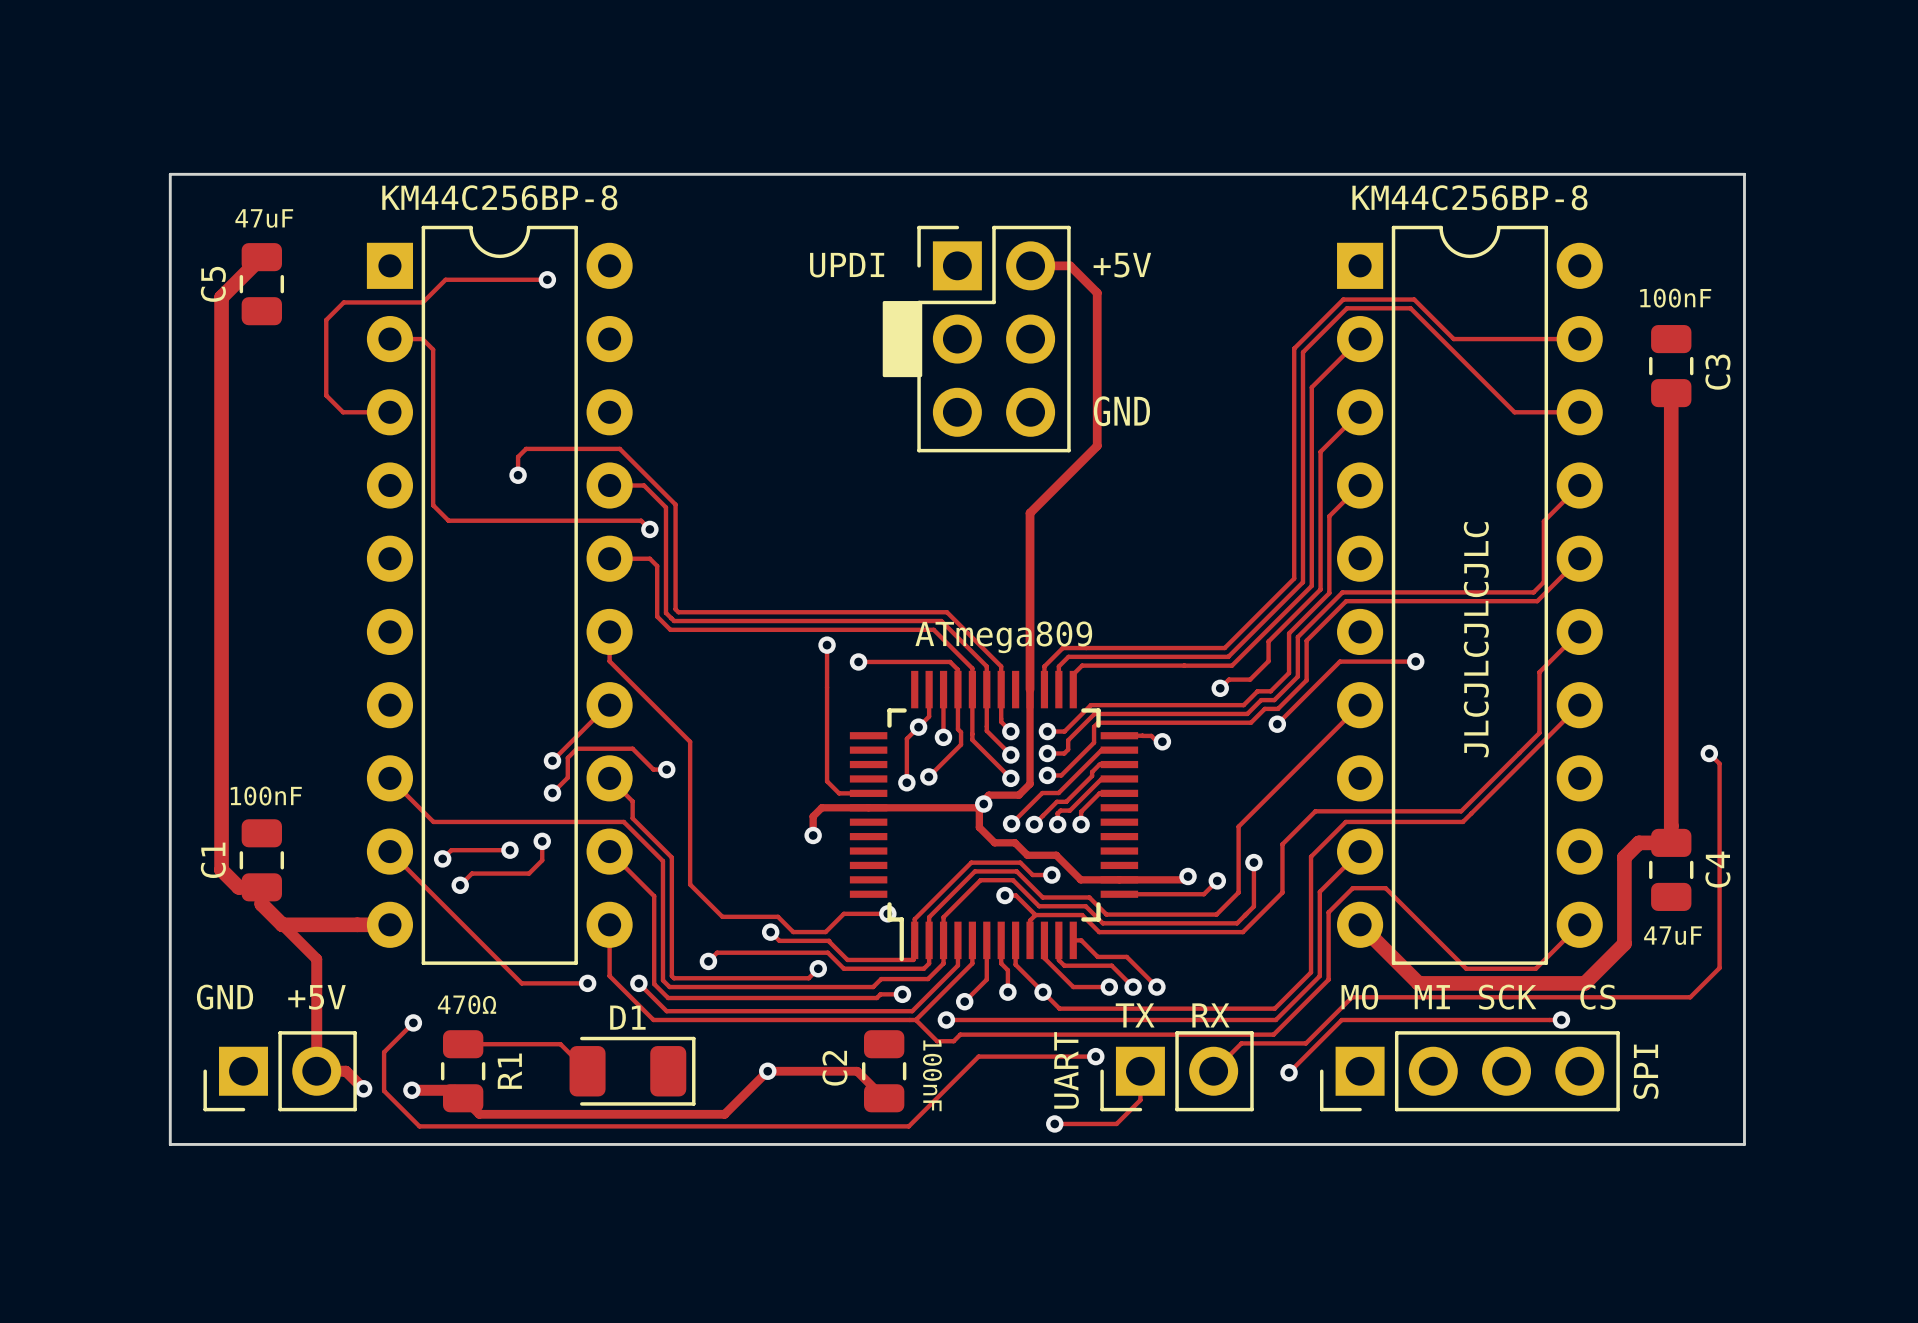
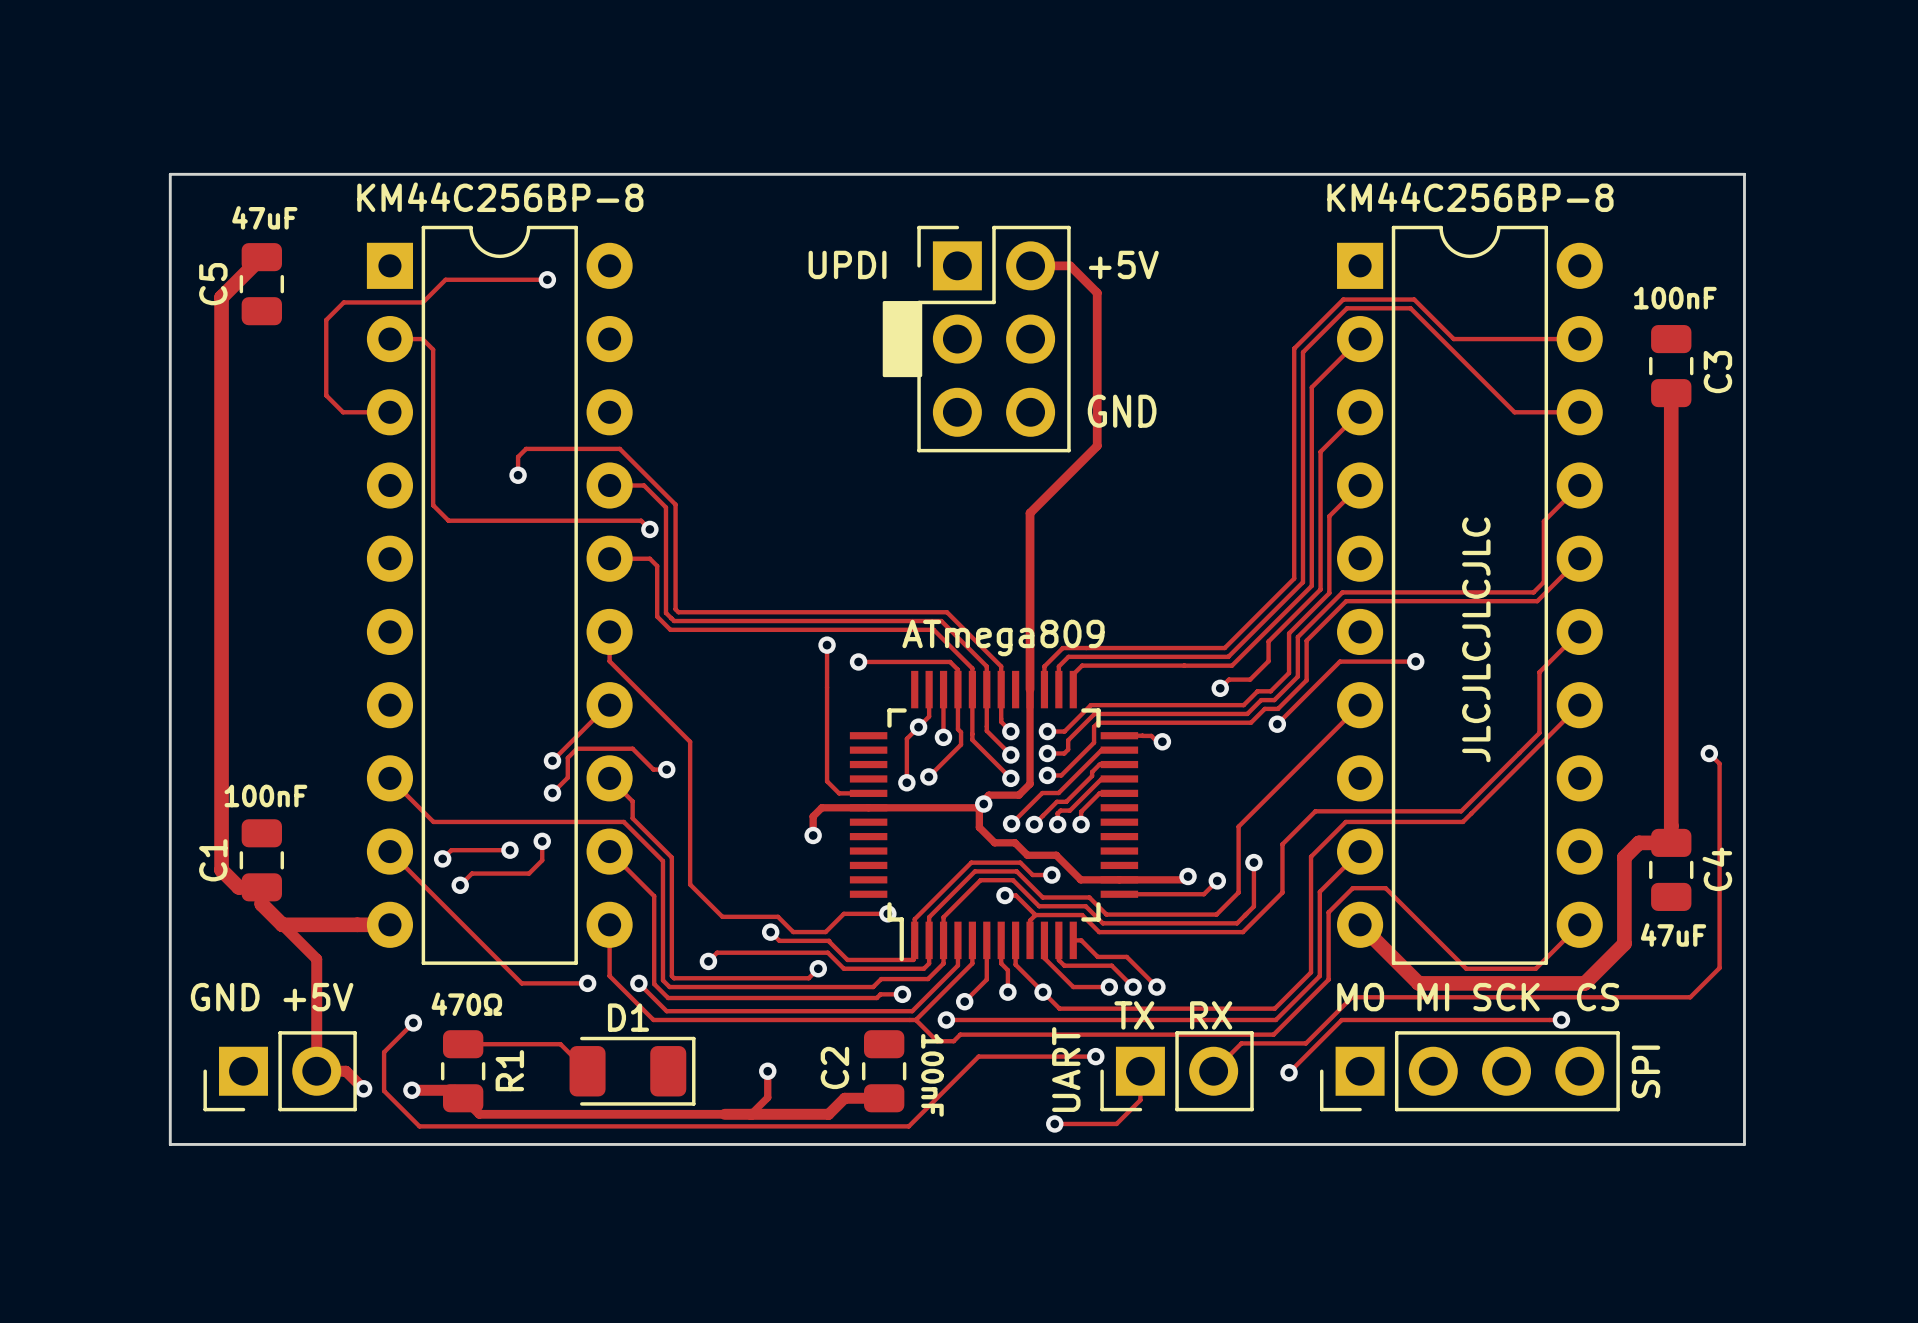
track: none -> (767, 1071) (767, 1097) (751, 1114)
track: (884, 1098) (857, 1071) (767, 1071) (724, 1114) -> (884, 1098) (844, 1098) (828, 1114) (724, 1114)

